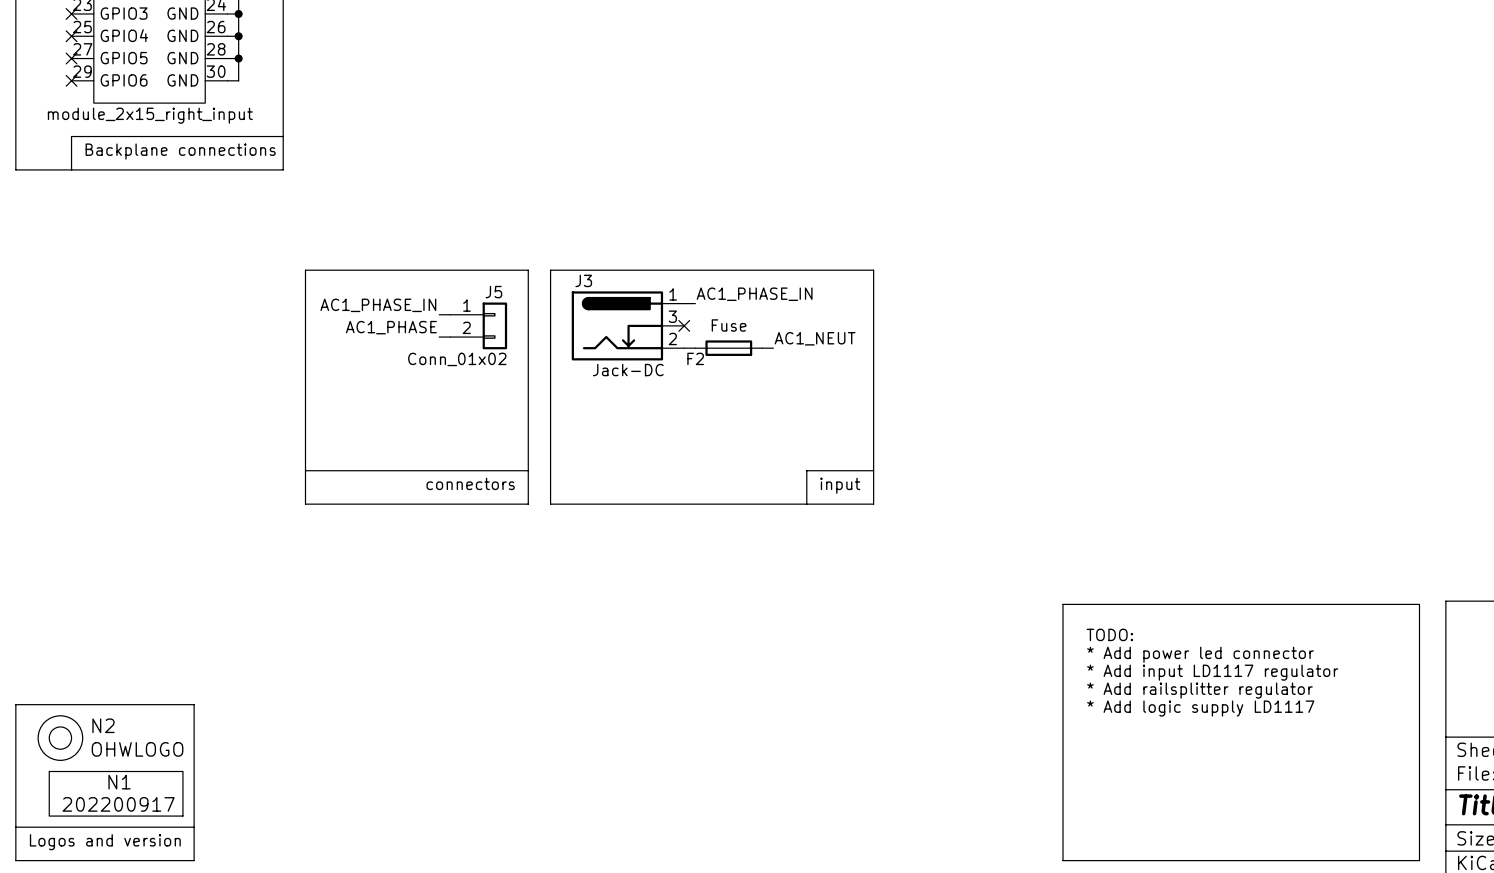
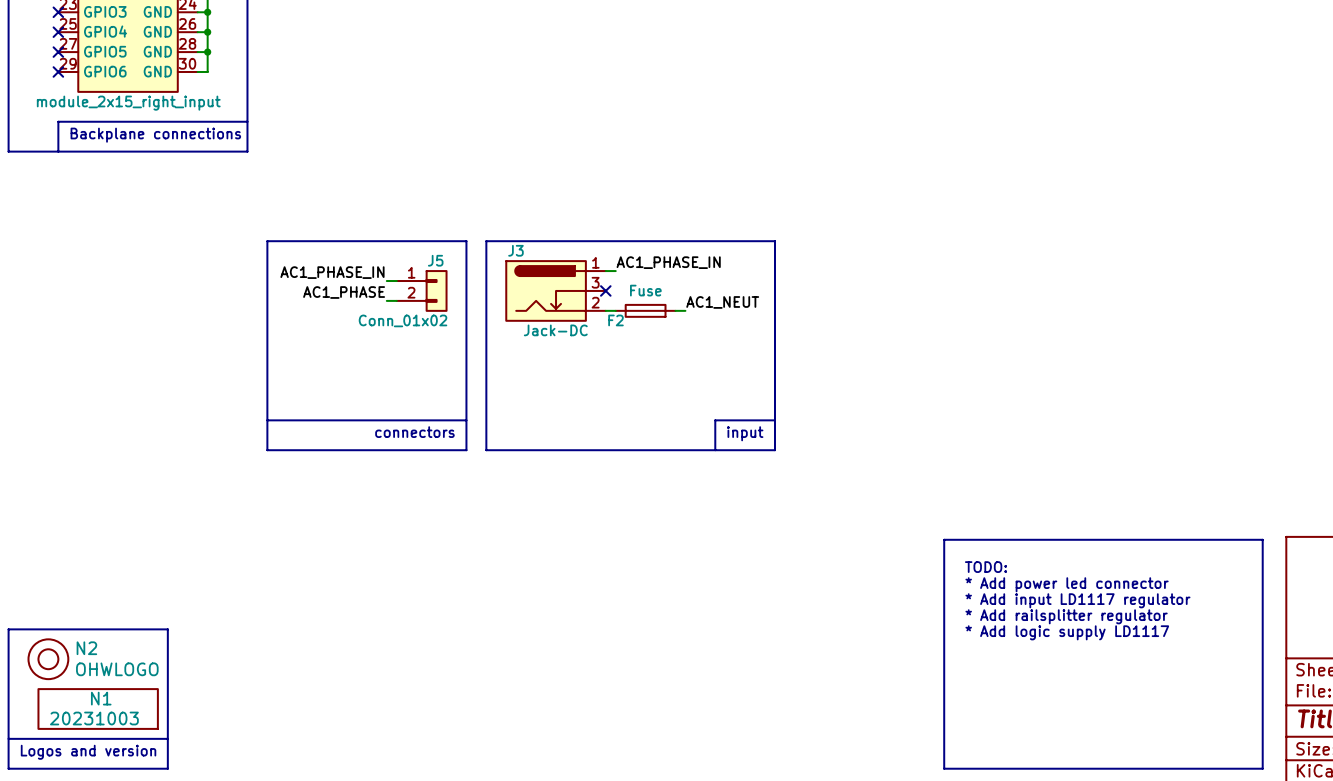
N1 value: 202200917 (118, 804) -> 20231003 (94, 718)

